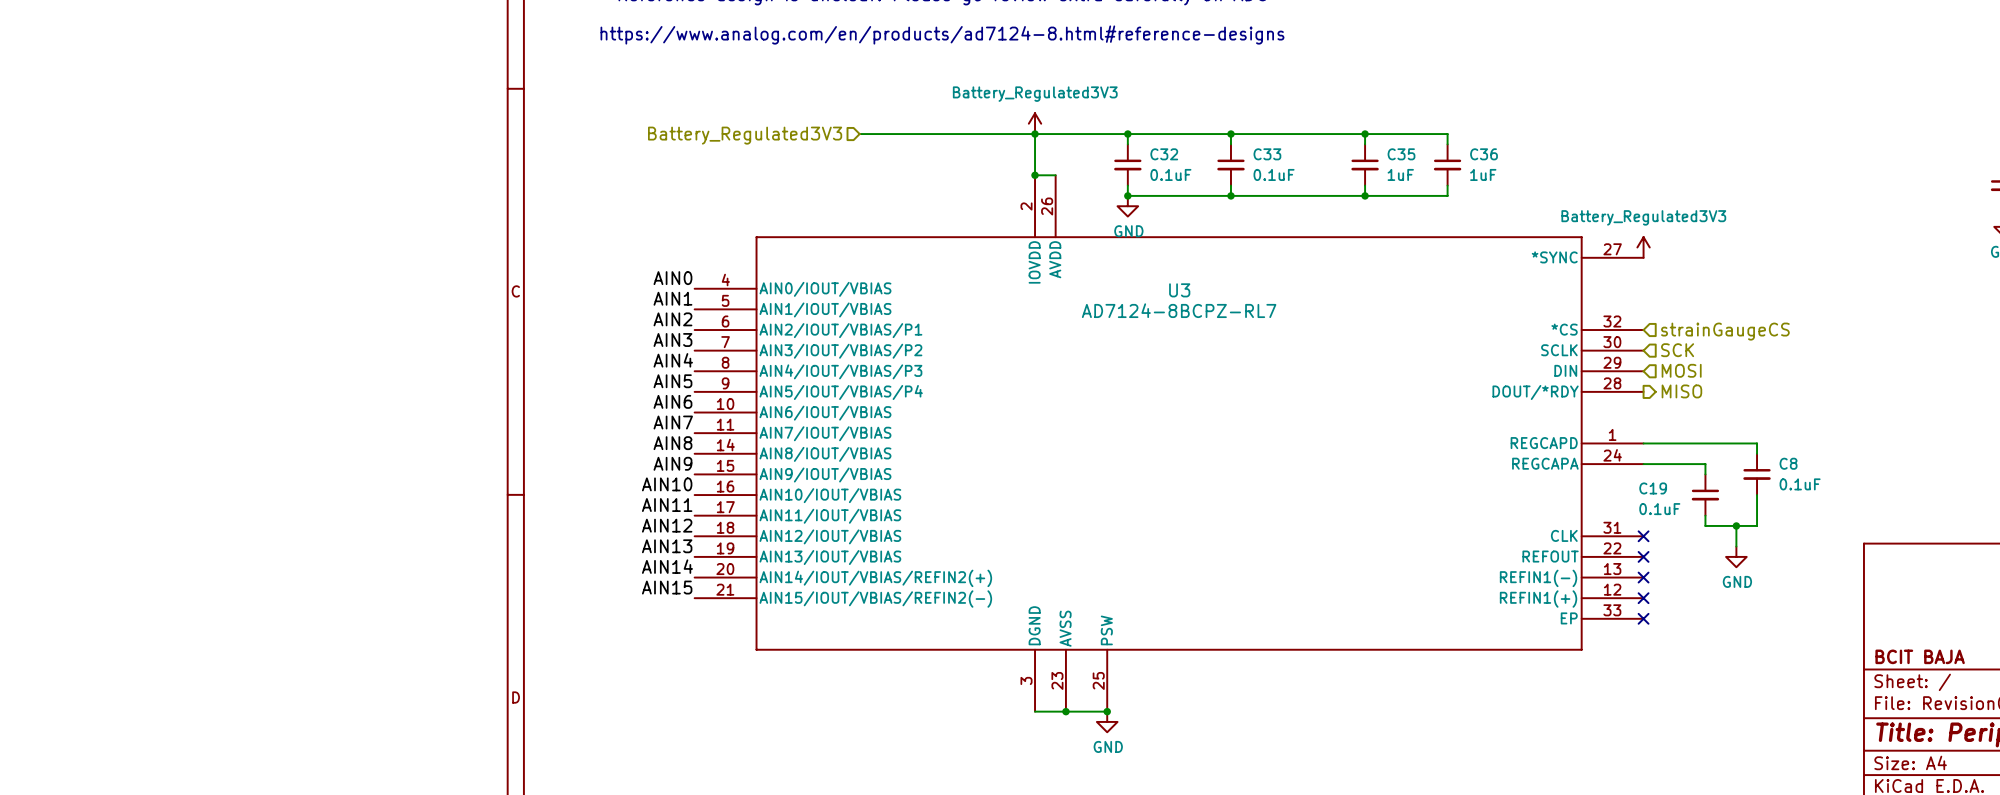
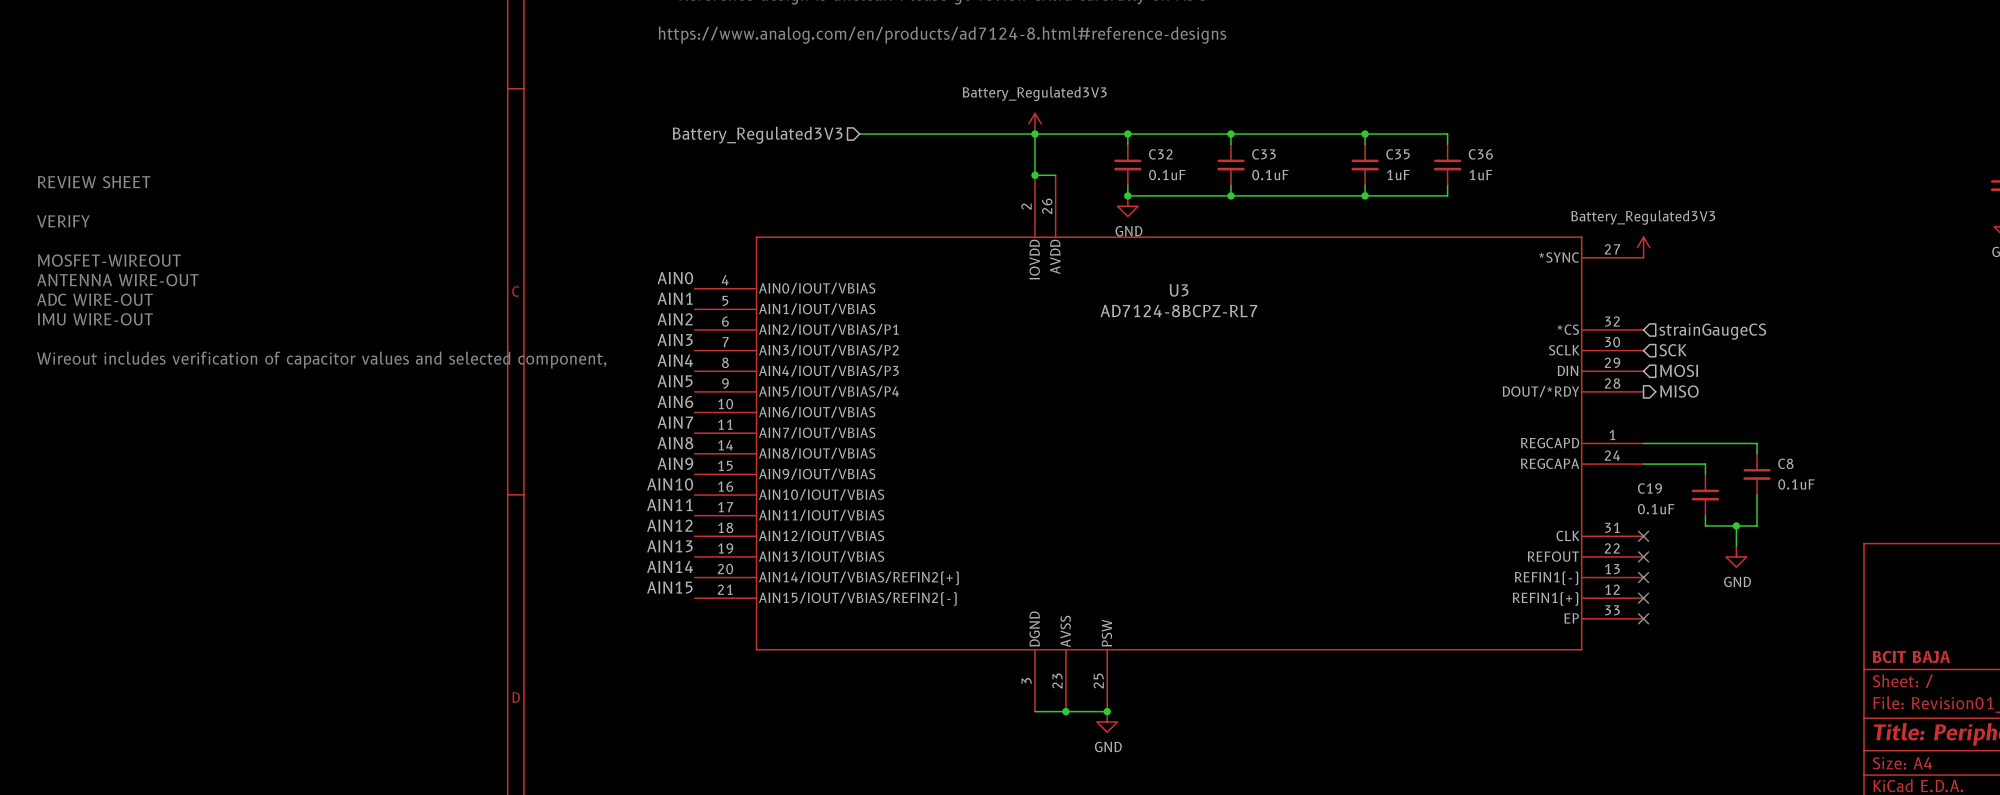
text: none -> REVIEW SHEET (94, 182)
text: none -> VERIFY (63, 221)
text: none -> MOSFET-WIREOUT (109, 260)
text: none -> ANTENNA WIRE-OUT (117, 280)
text: none -> ADC WIRE-OUT (94, 299)
text: none -> IMU WIRE-OUT (95, 319)
text: none -> Wireout includes verification of capacitor values and selected component, (321, 360)

